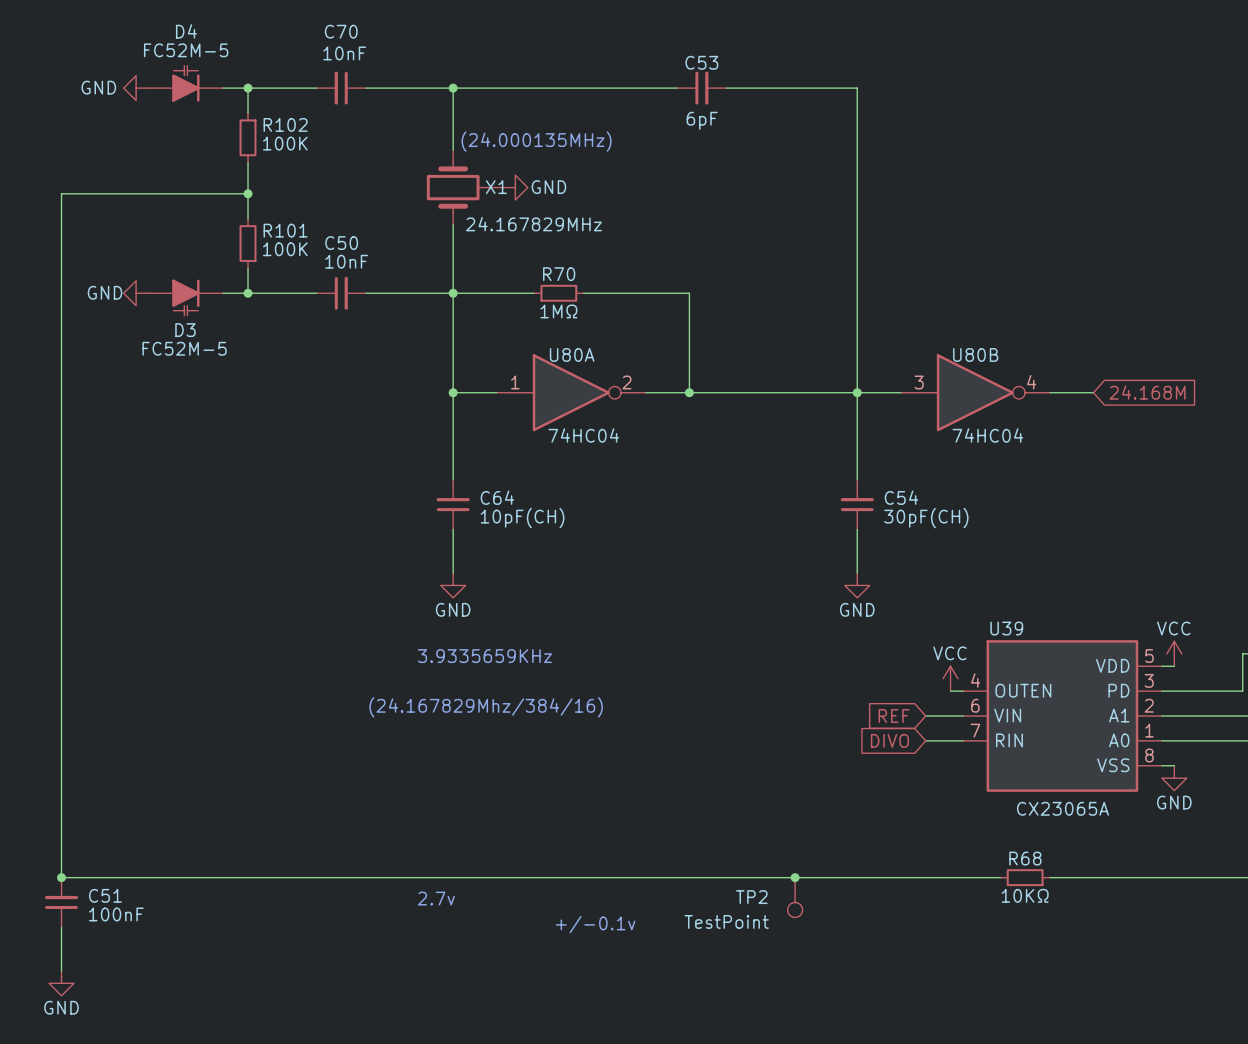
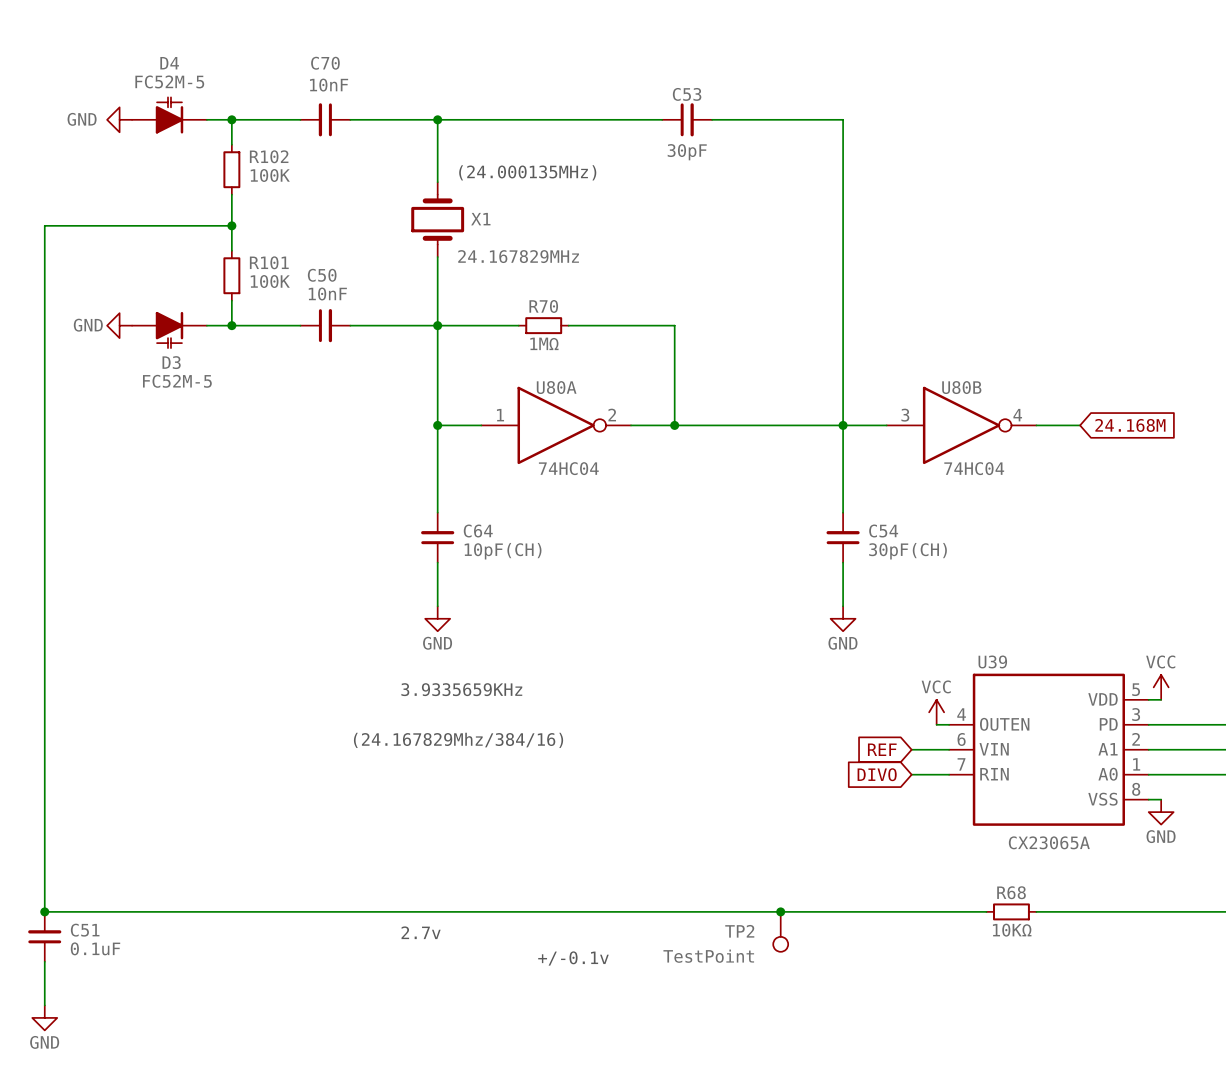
C53 value: 6pF (702, 120) -> 30pF (687, 152)
X1 symbol: [426, 150, 503, 225] -> [411, 182, 465, 258]
power symbol: GND (515, 187) -> none
C51 value: 100nF (116, 914) -> 0.1uF (95, 948)

